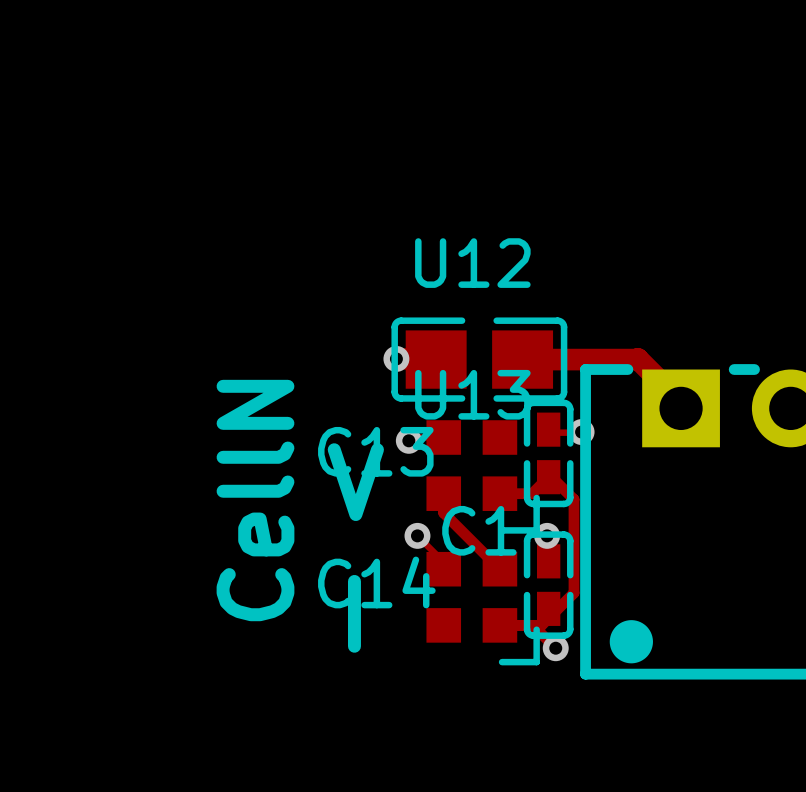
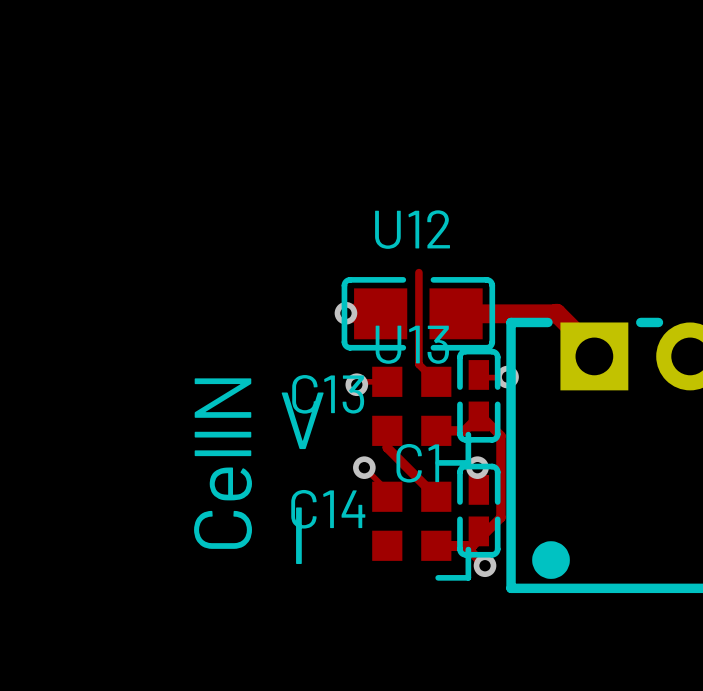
track: none -> (418, 272) (418, 364) (436, 381)

